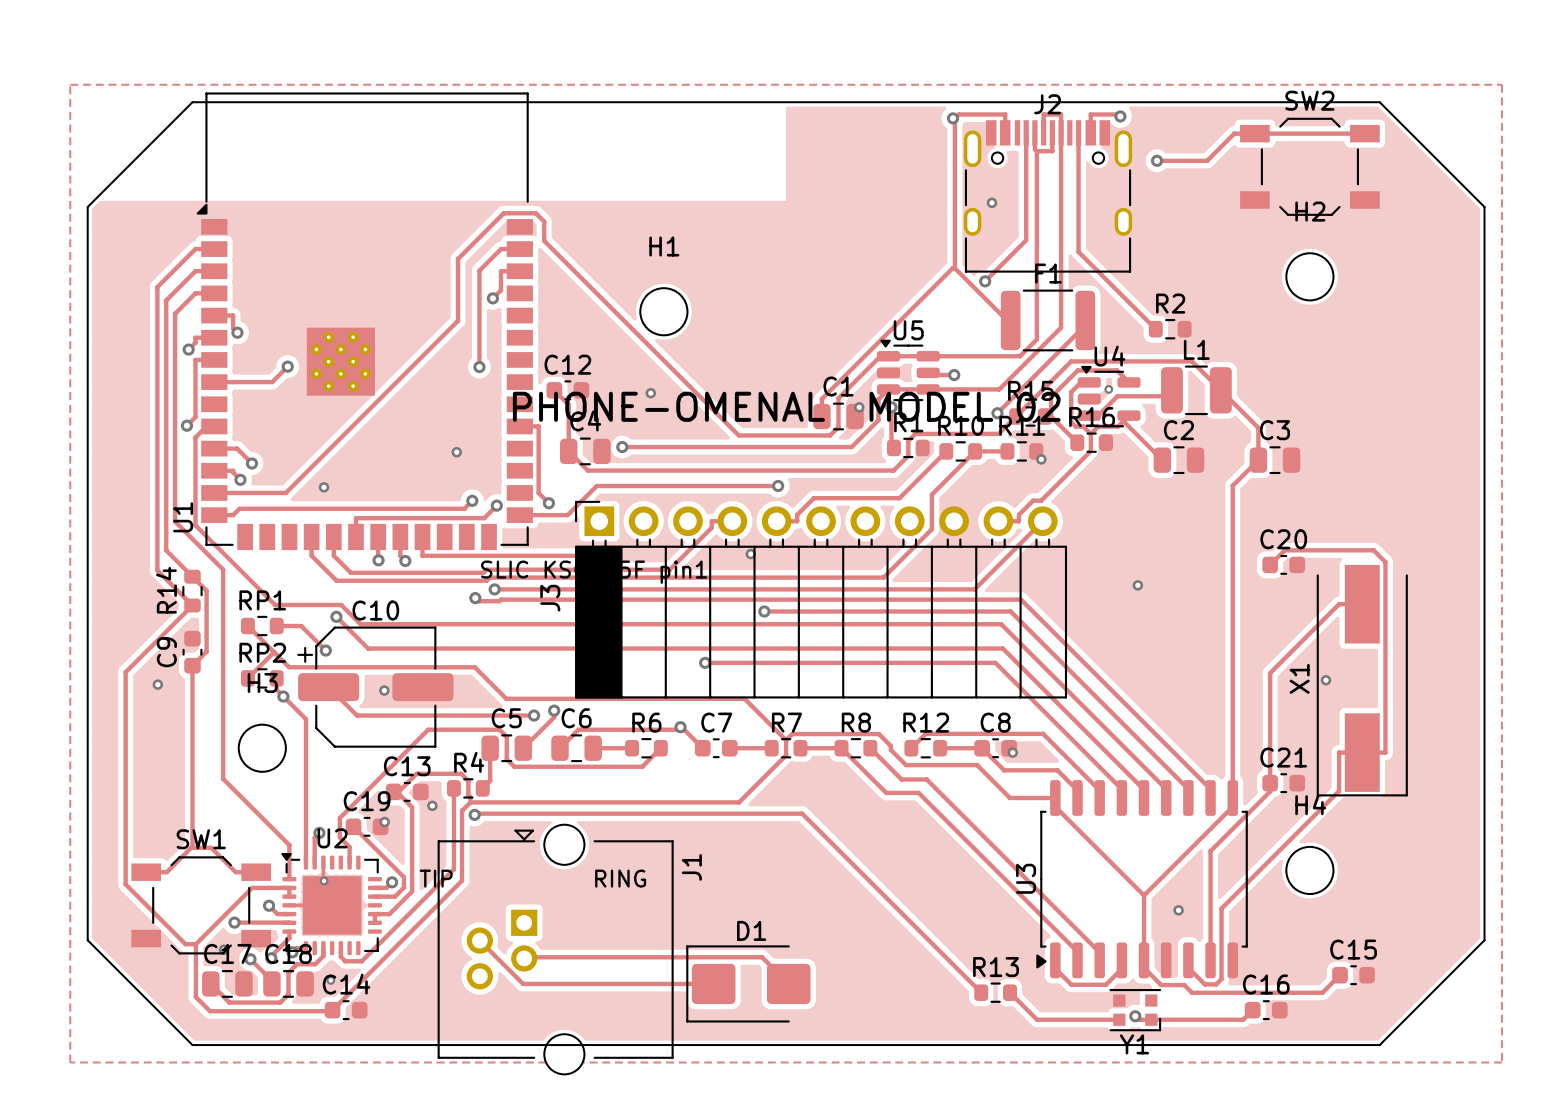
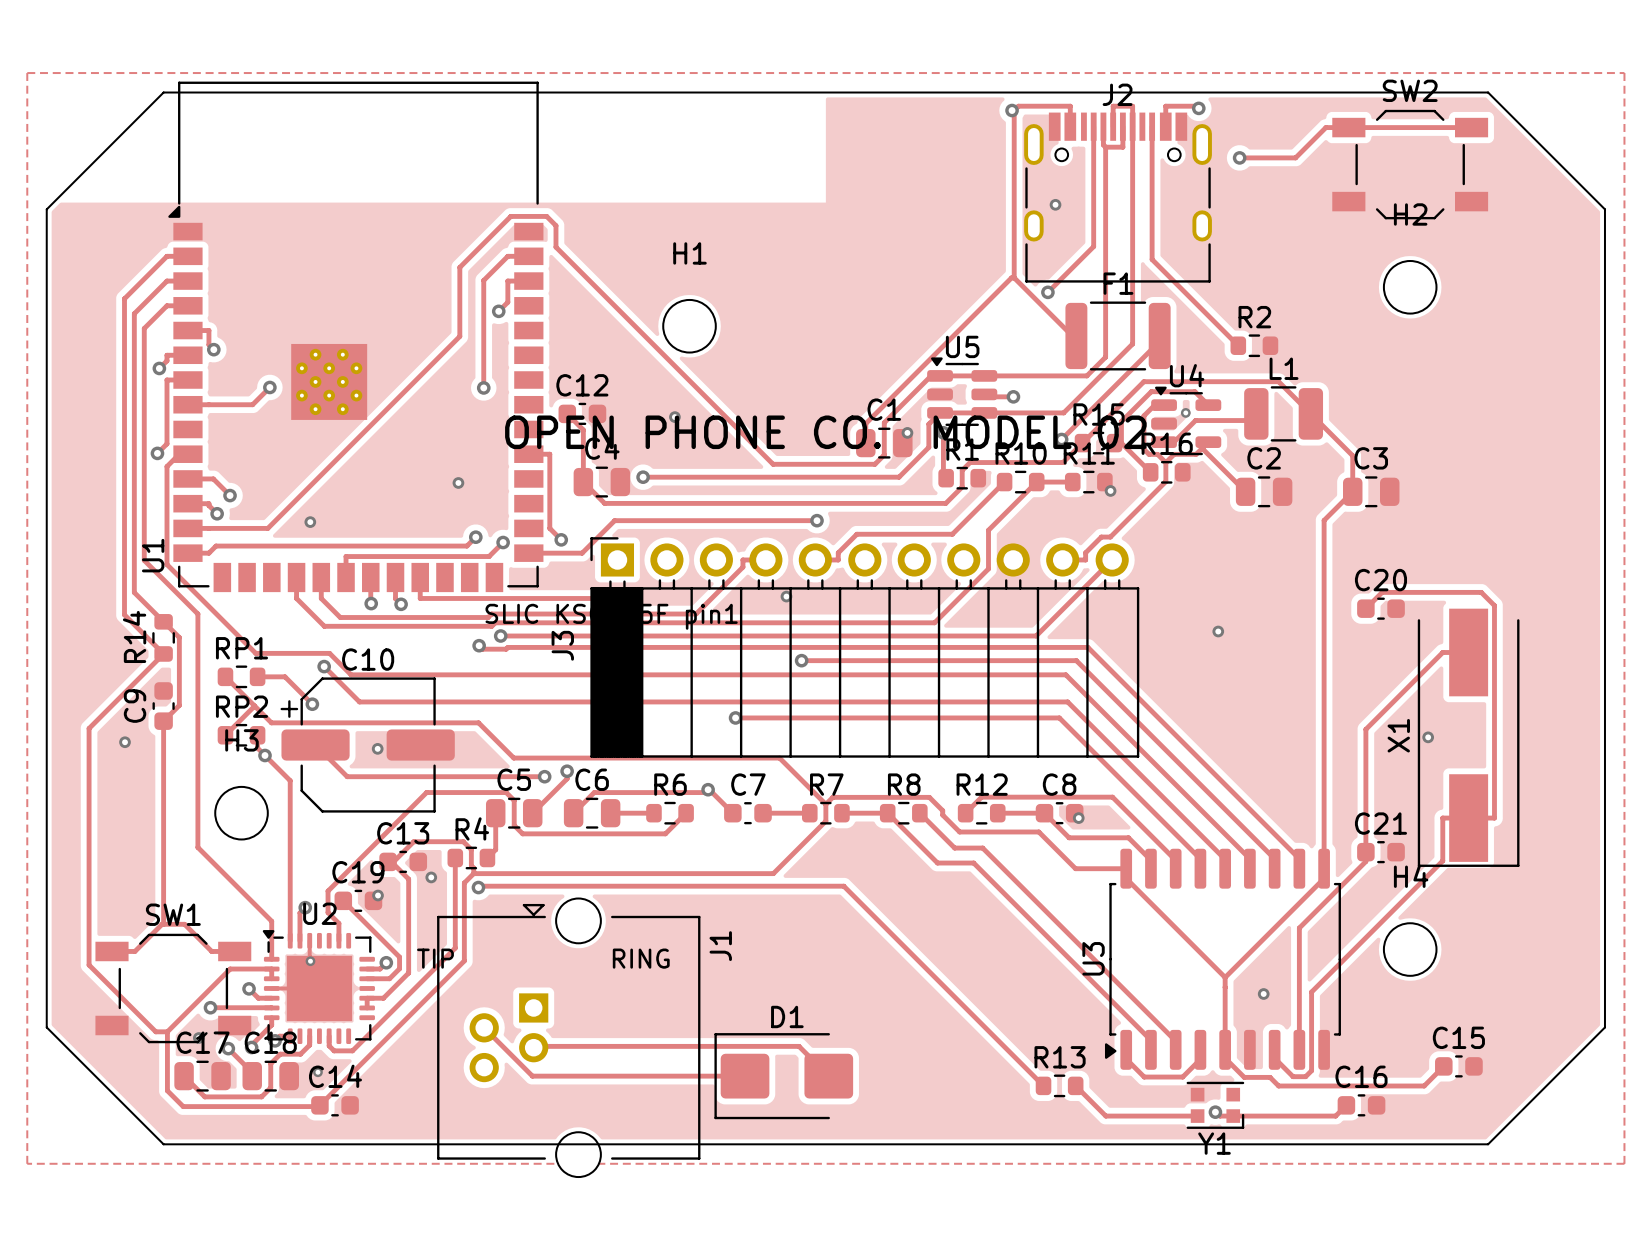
text: PHONE-OMENAL MODEL 02 (786, 406) -> OPEN PHONE CO. MODEL 02 (825, 432)

